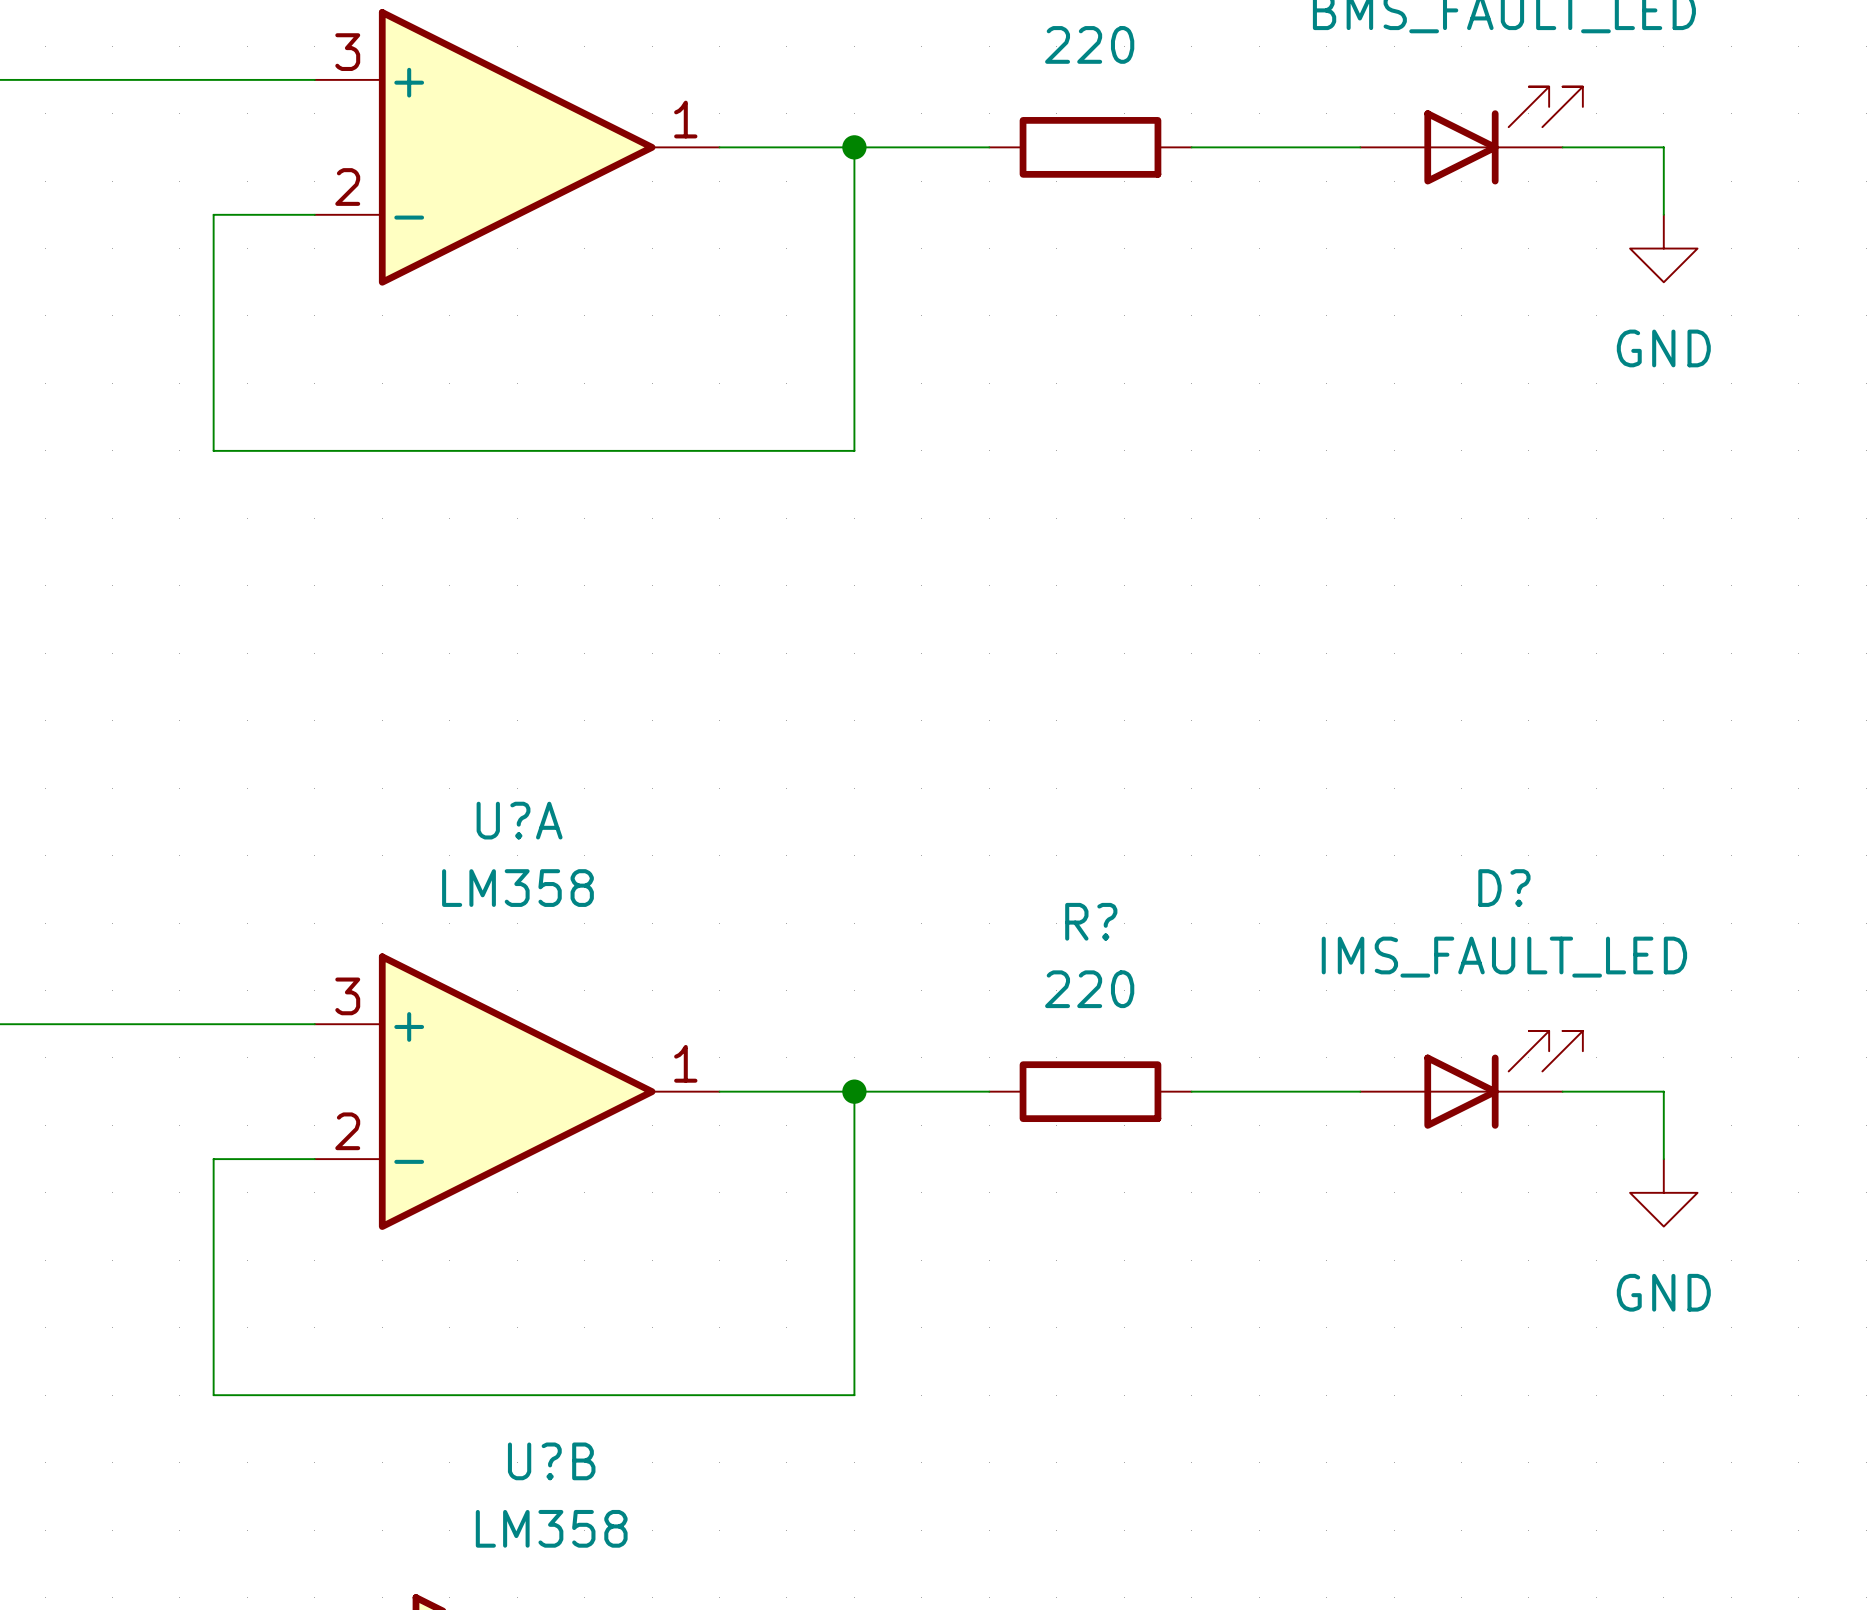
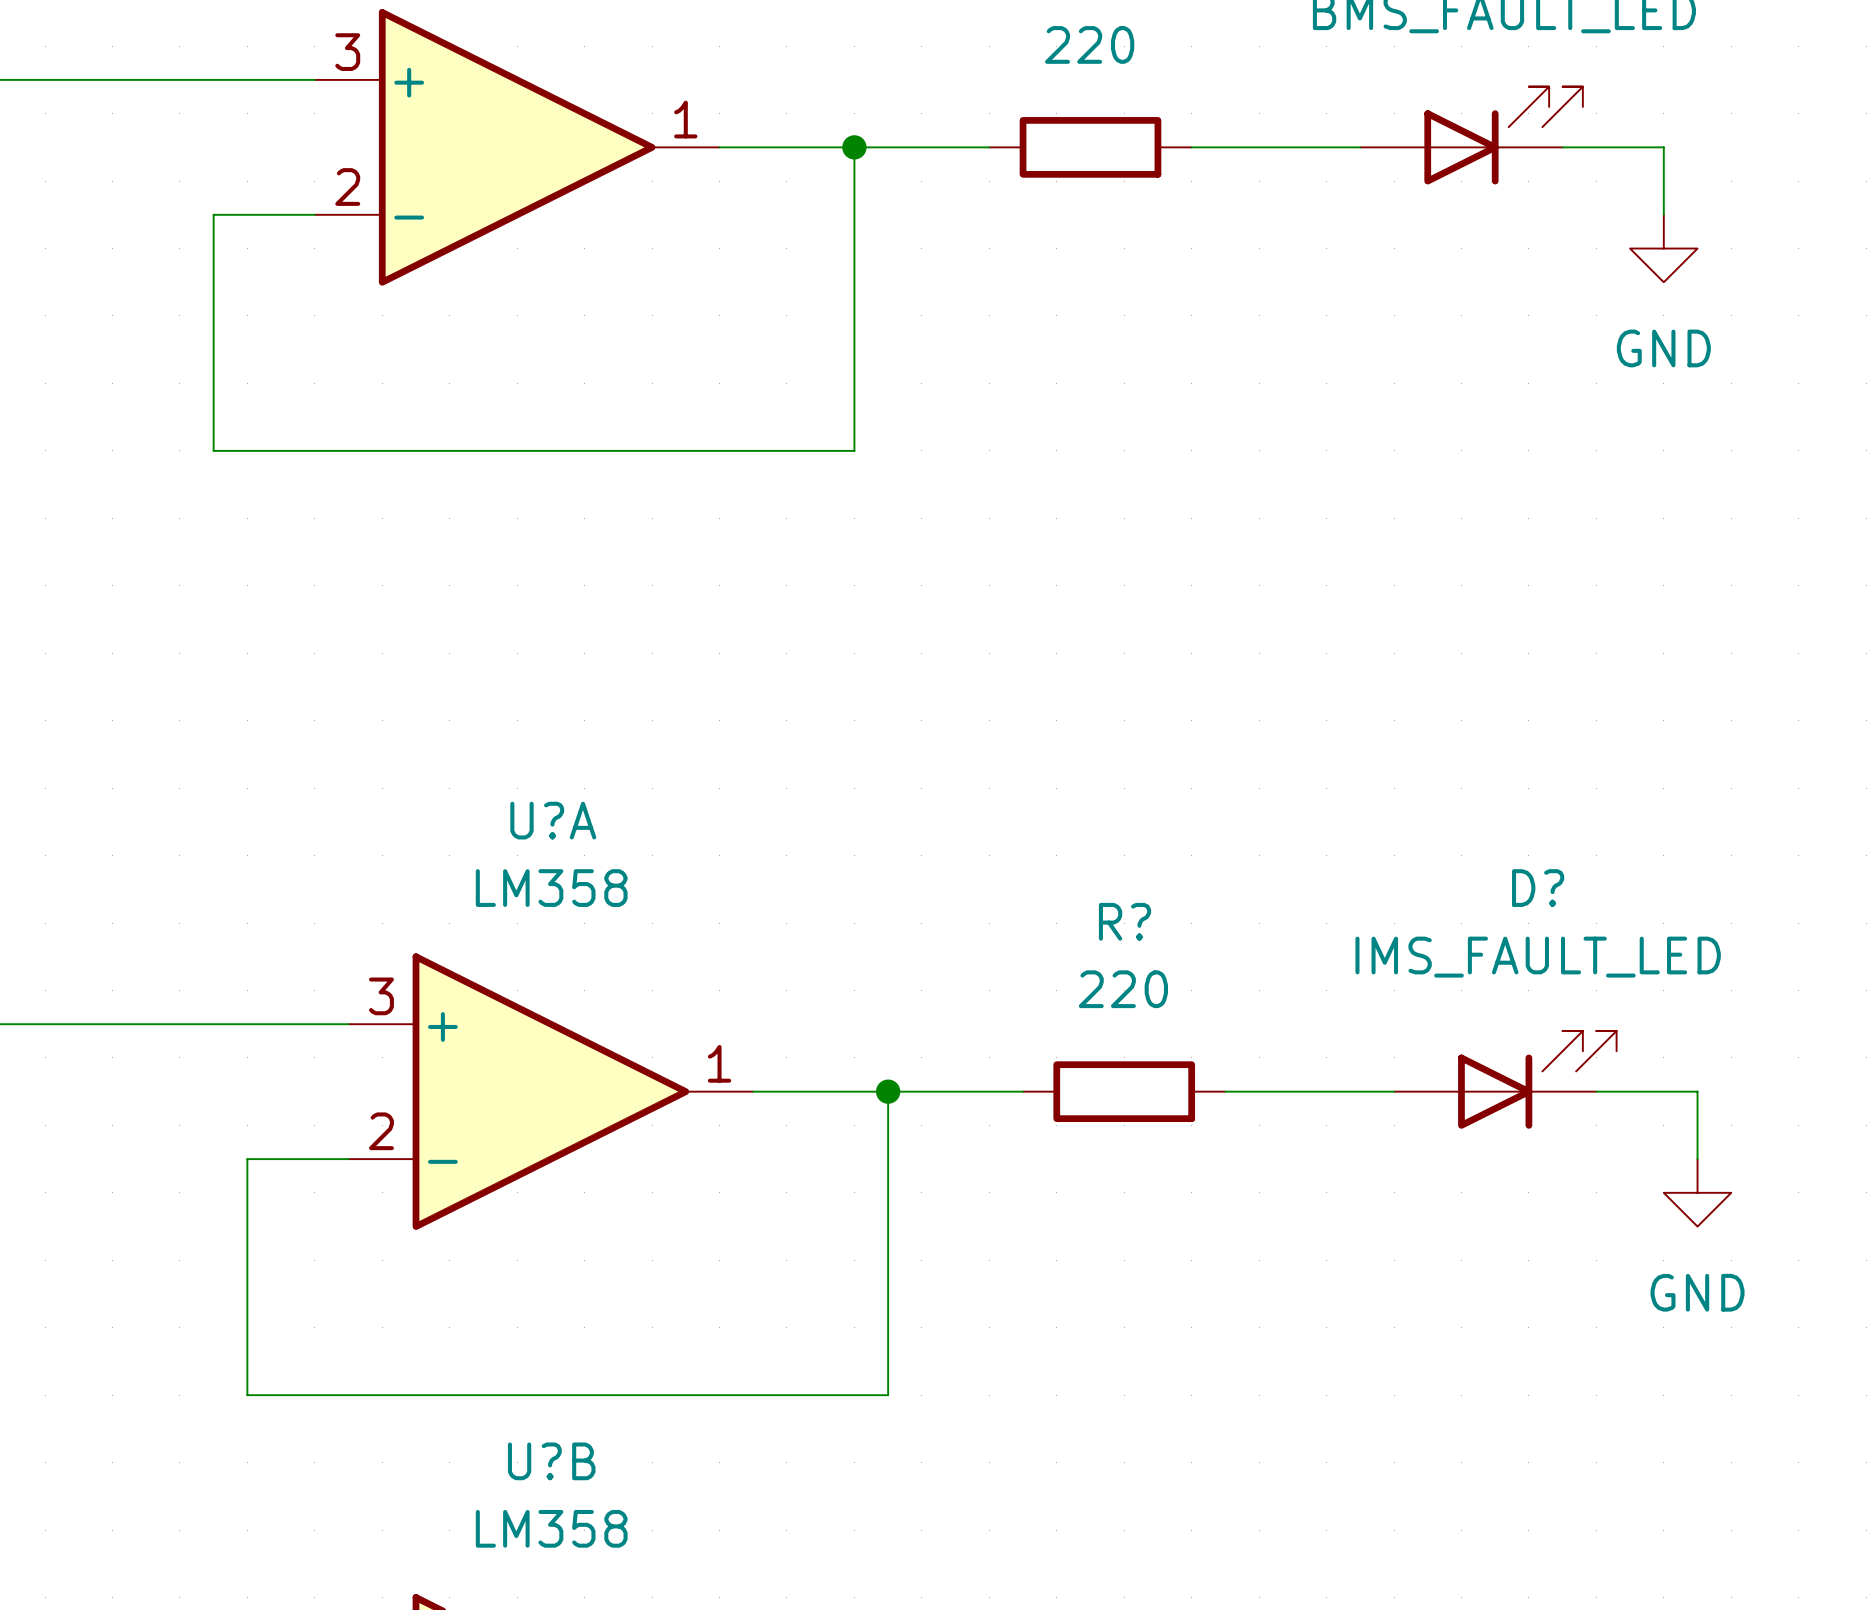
D? position: (1471, 1079) -> (1505, 1079)
U?A position: (517, 1091) -> (550, 1091)
wire: (854, 1091) (854, 1395) -> (888, 1091) (888, 1395) (854, 1395)
junction position: (854, 1091) -> (888, 1091)
R? position: (1090, 1091) -> (1124, 1091)
wire: (1663, 1091) (1663, 1159) -> (1663, 1091) (1697, 1091) (1697, 1159)
wire: (247, 1159) (213, 1159) (213, 1395) (247, 1395) -> (247, 1159) (247, 1395)
power symbol position: GND (1663, 1192) -> GND (1697, 1192)

